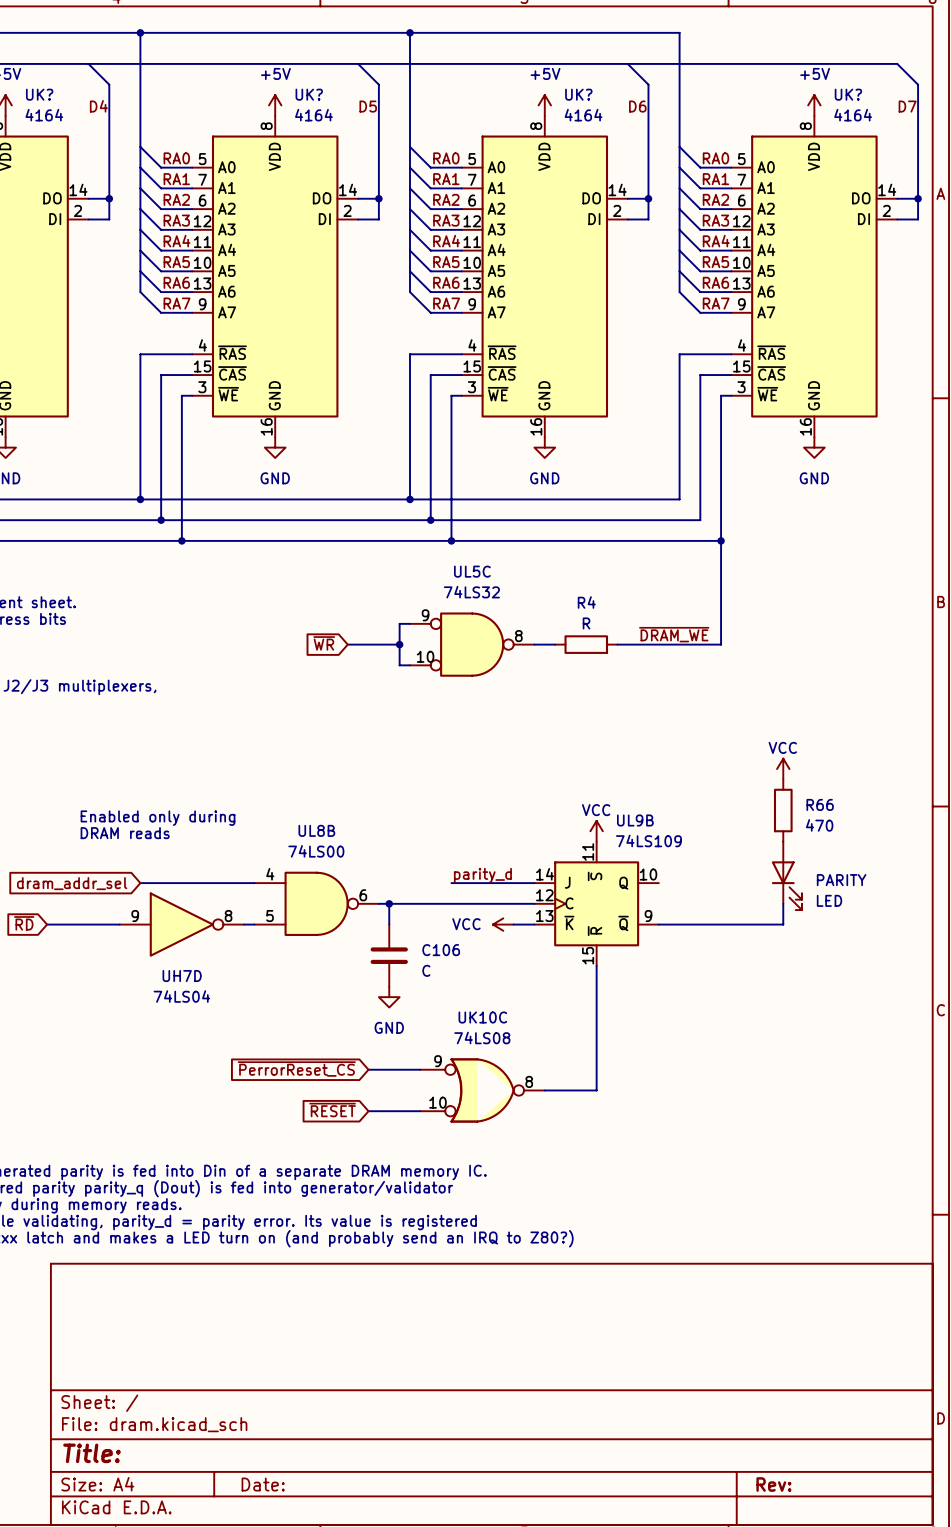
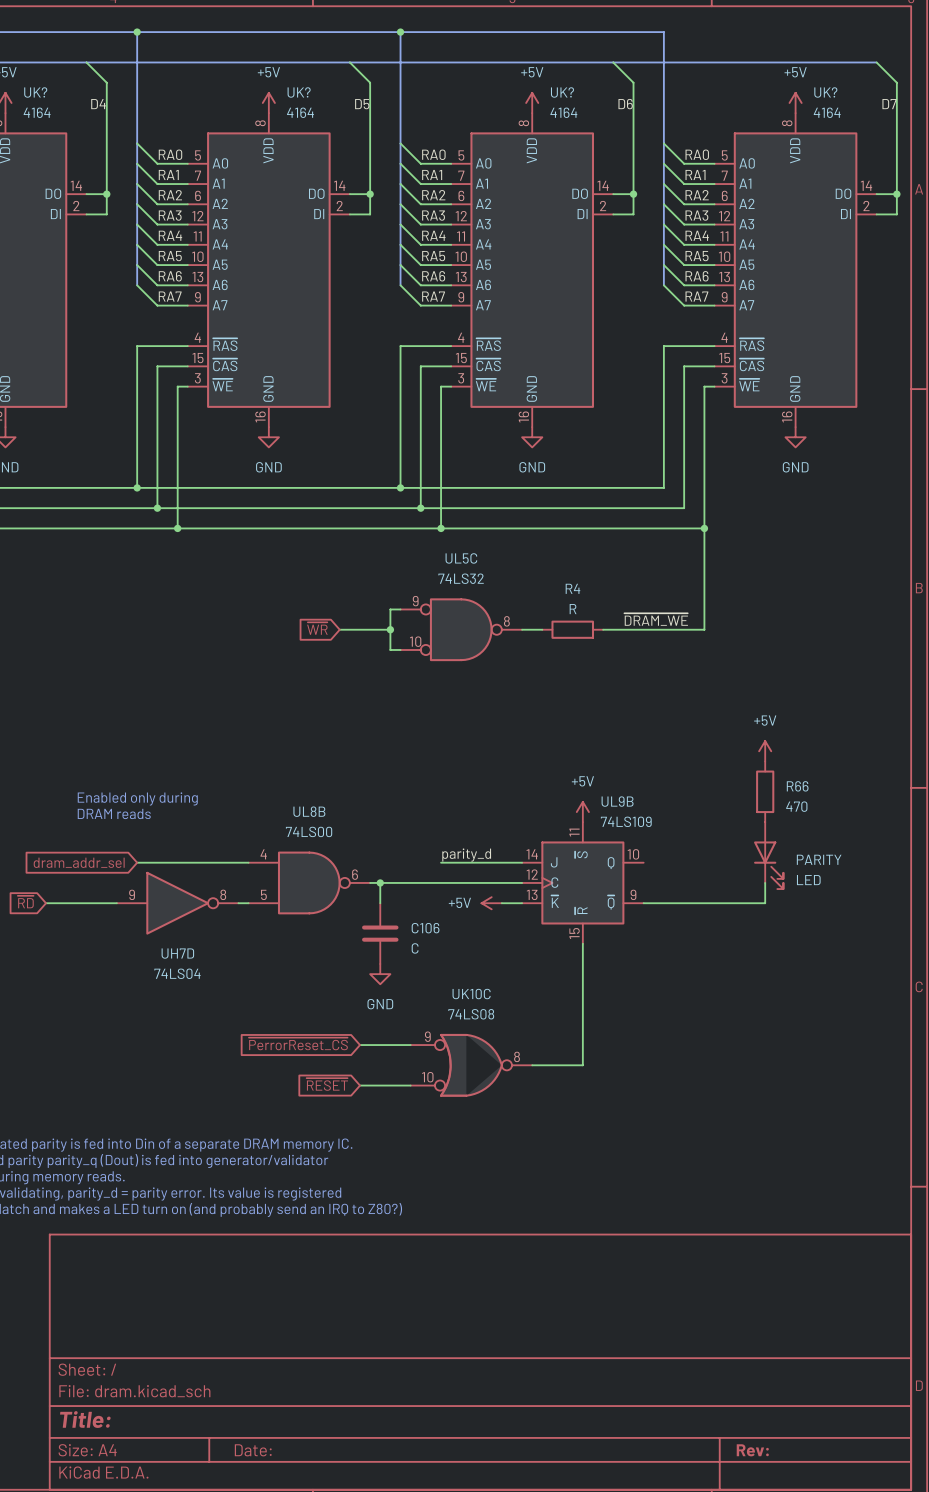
power symbol: VCC (783, 769) -> +5V (765, 751)
power symbol: VCC (596, 831) -> +5V (582, 812)
power symbol: VCC (503, 924) -> +5V (491, 903)

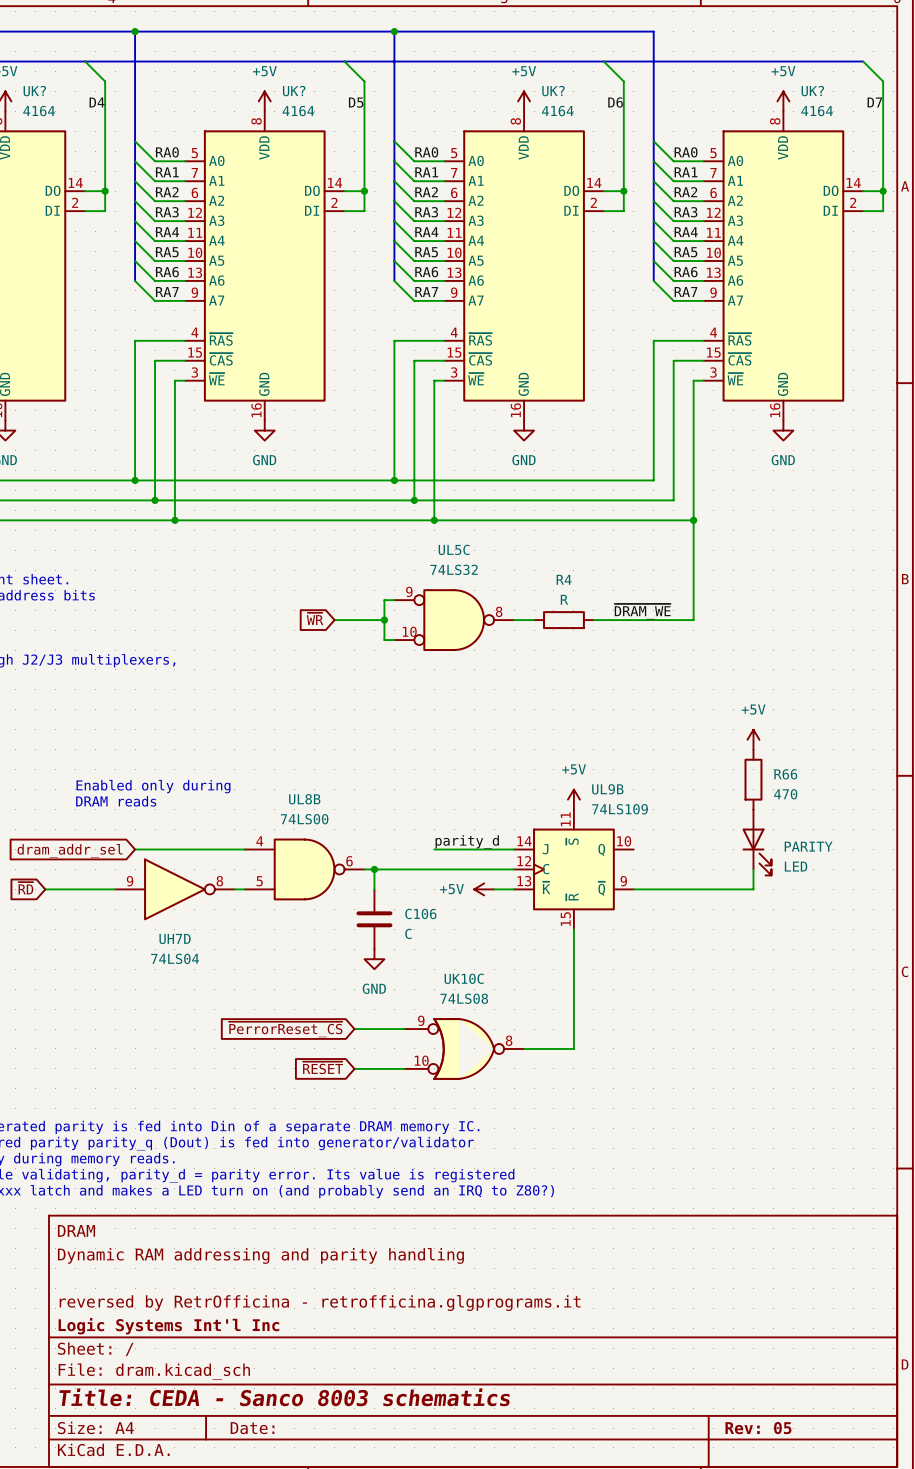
title block: none -> DRAM (76, 1230)
title block: none -> Dynamic RAM addressing and parity handling (260, 1255)
title block: none -> reversed by RetrOfficina - retrofficina.glgprograms.it (320, 1303)
title block: none -> Logic Systems Int'l Inc (168, 1326)
title block: Title: (85, 1419) -> Title: CEDA - Sanco 8003 schematics (284, 1397)
title block: Rev: (752, 1450) -> Rev: 05 (758, 1428)

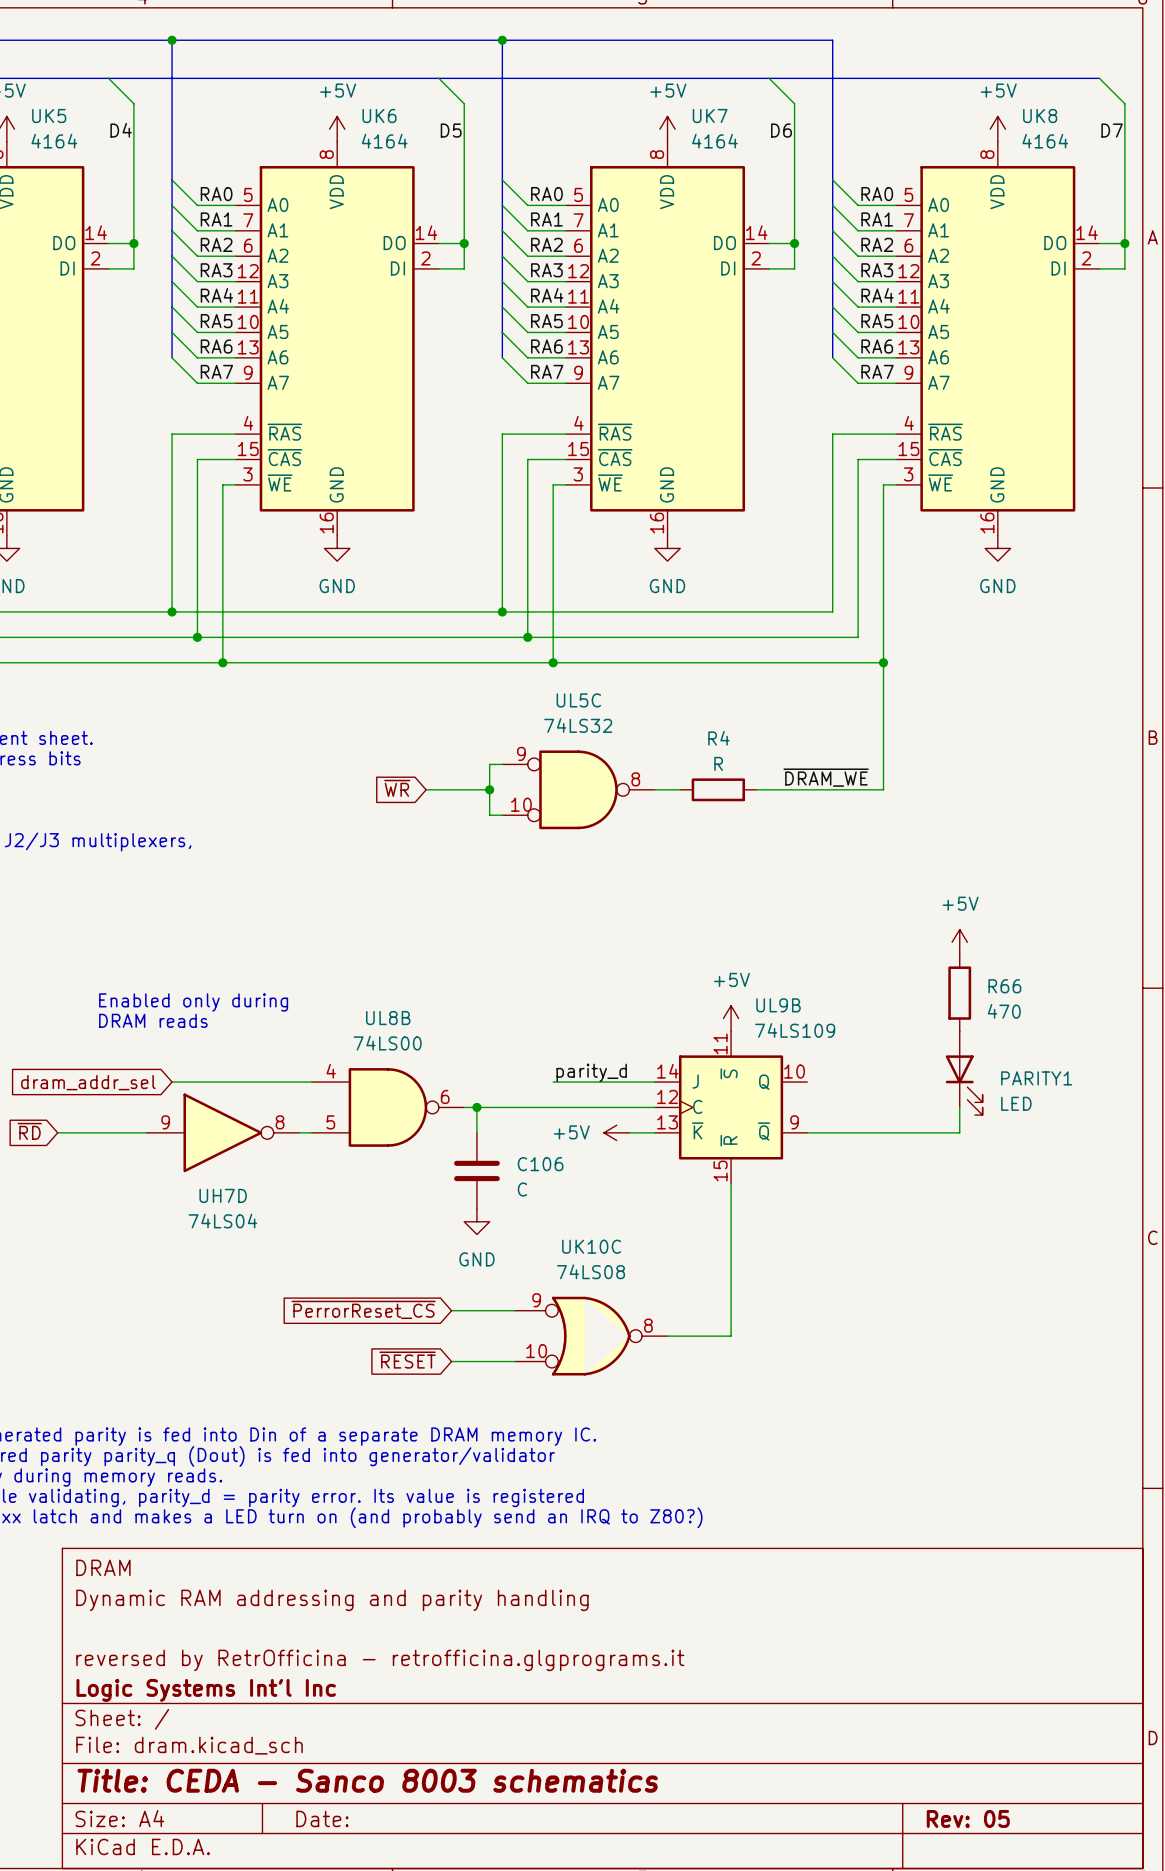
UK? name: UK? (34, 91) -> UK5 (49, 116)
UK? name: UK? (294, 91) -> UK6 (379, 116)
UK? name: UK? (553, 91) -> UK7 (710, 116)
UK? name: UK? (812, 91) -> UK8 (1040, 116)
PARITY name: PARITY (808, 846) -> PARITY1 (1036, 1078)

